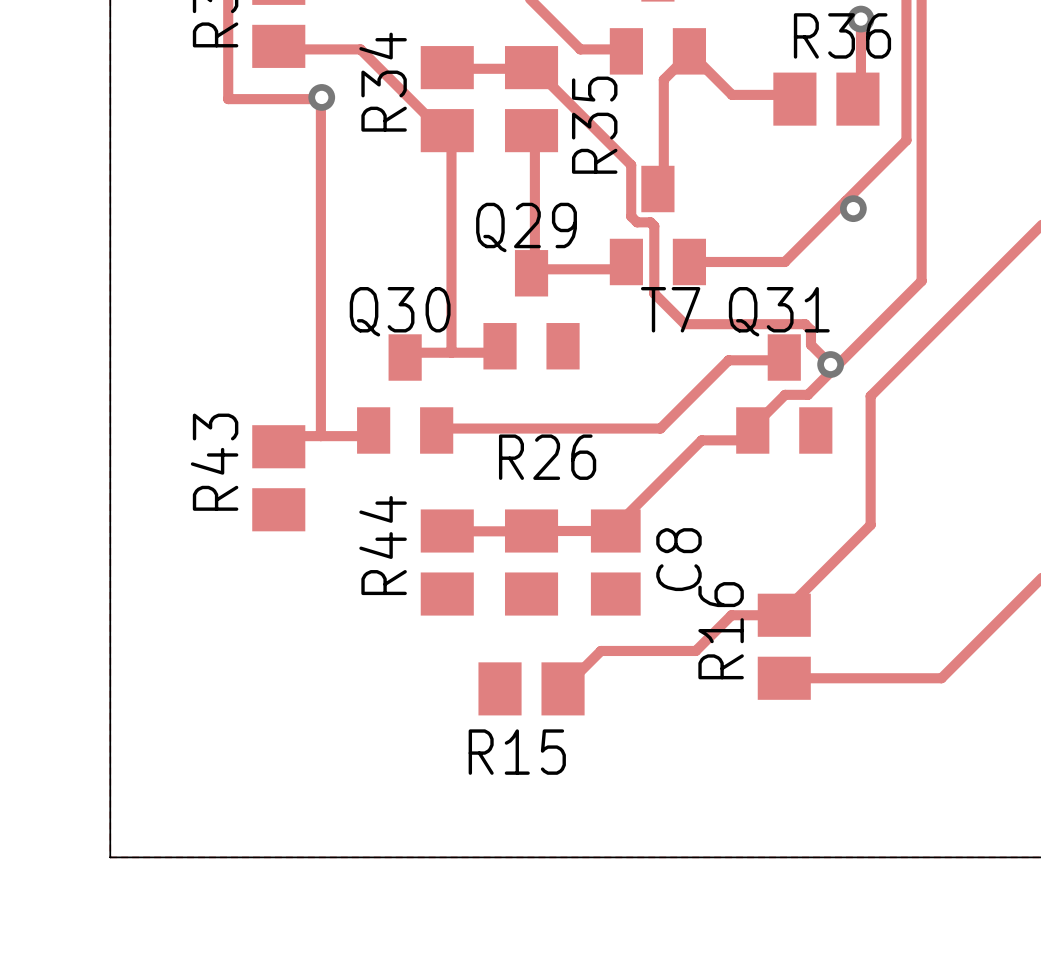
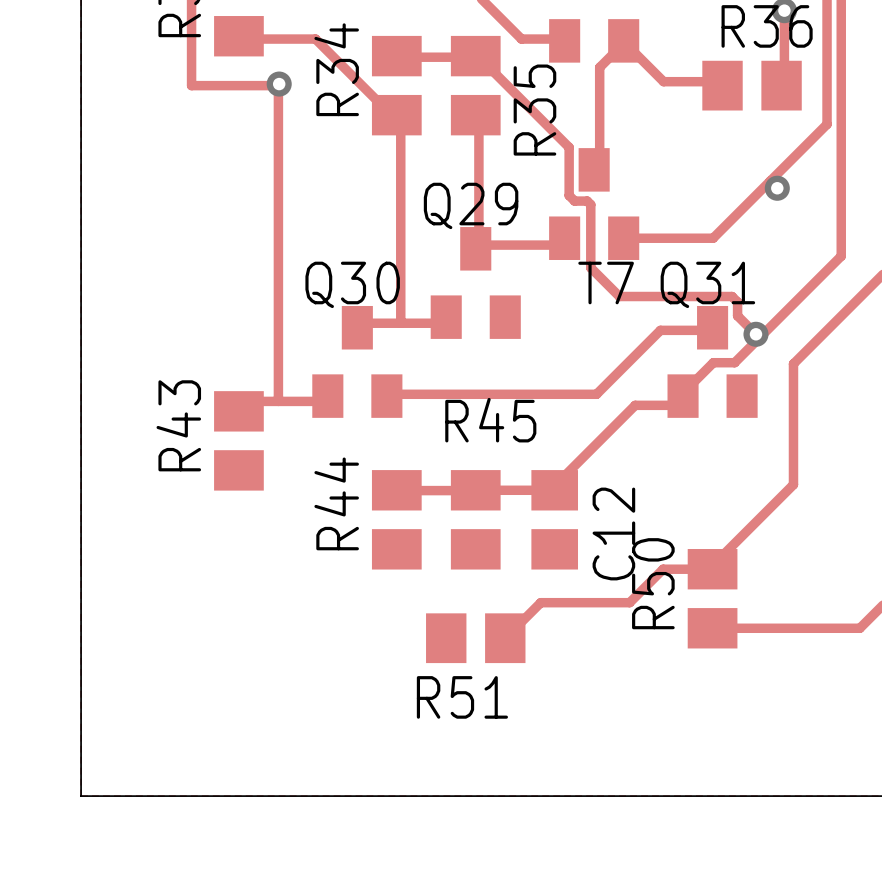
R26 name: R26 (547, 457) -> R45 (490, 420)
C8 name: C8 (678, 559) -> C12 (613, 534)
R16 name: R16 (721, 630) -> R50 (653, 583)
R15 name: R15 (517, 752) -> R51 (462, 697)

